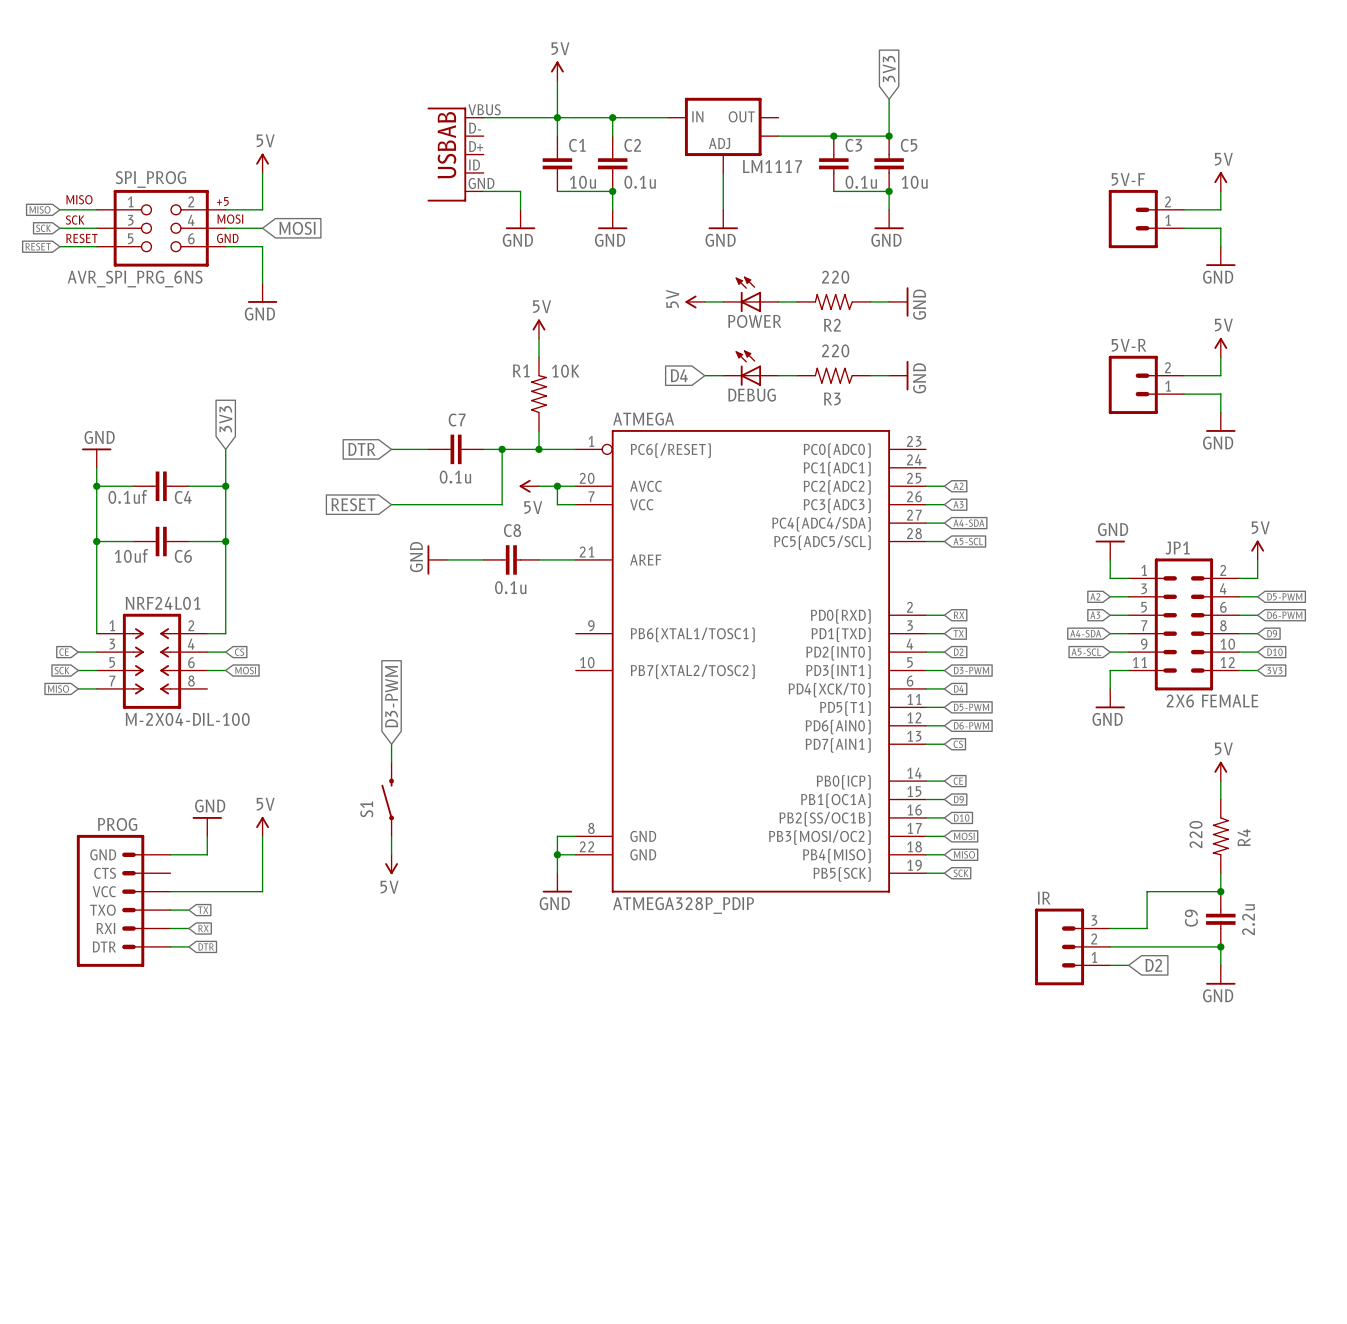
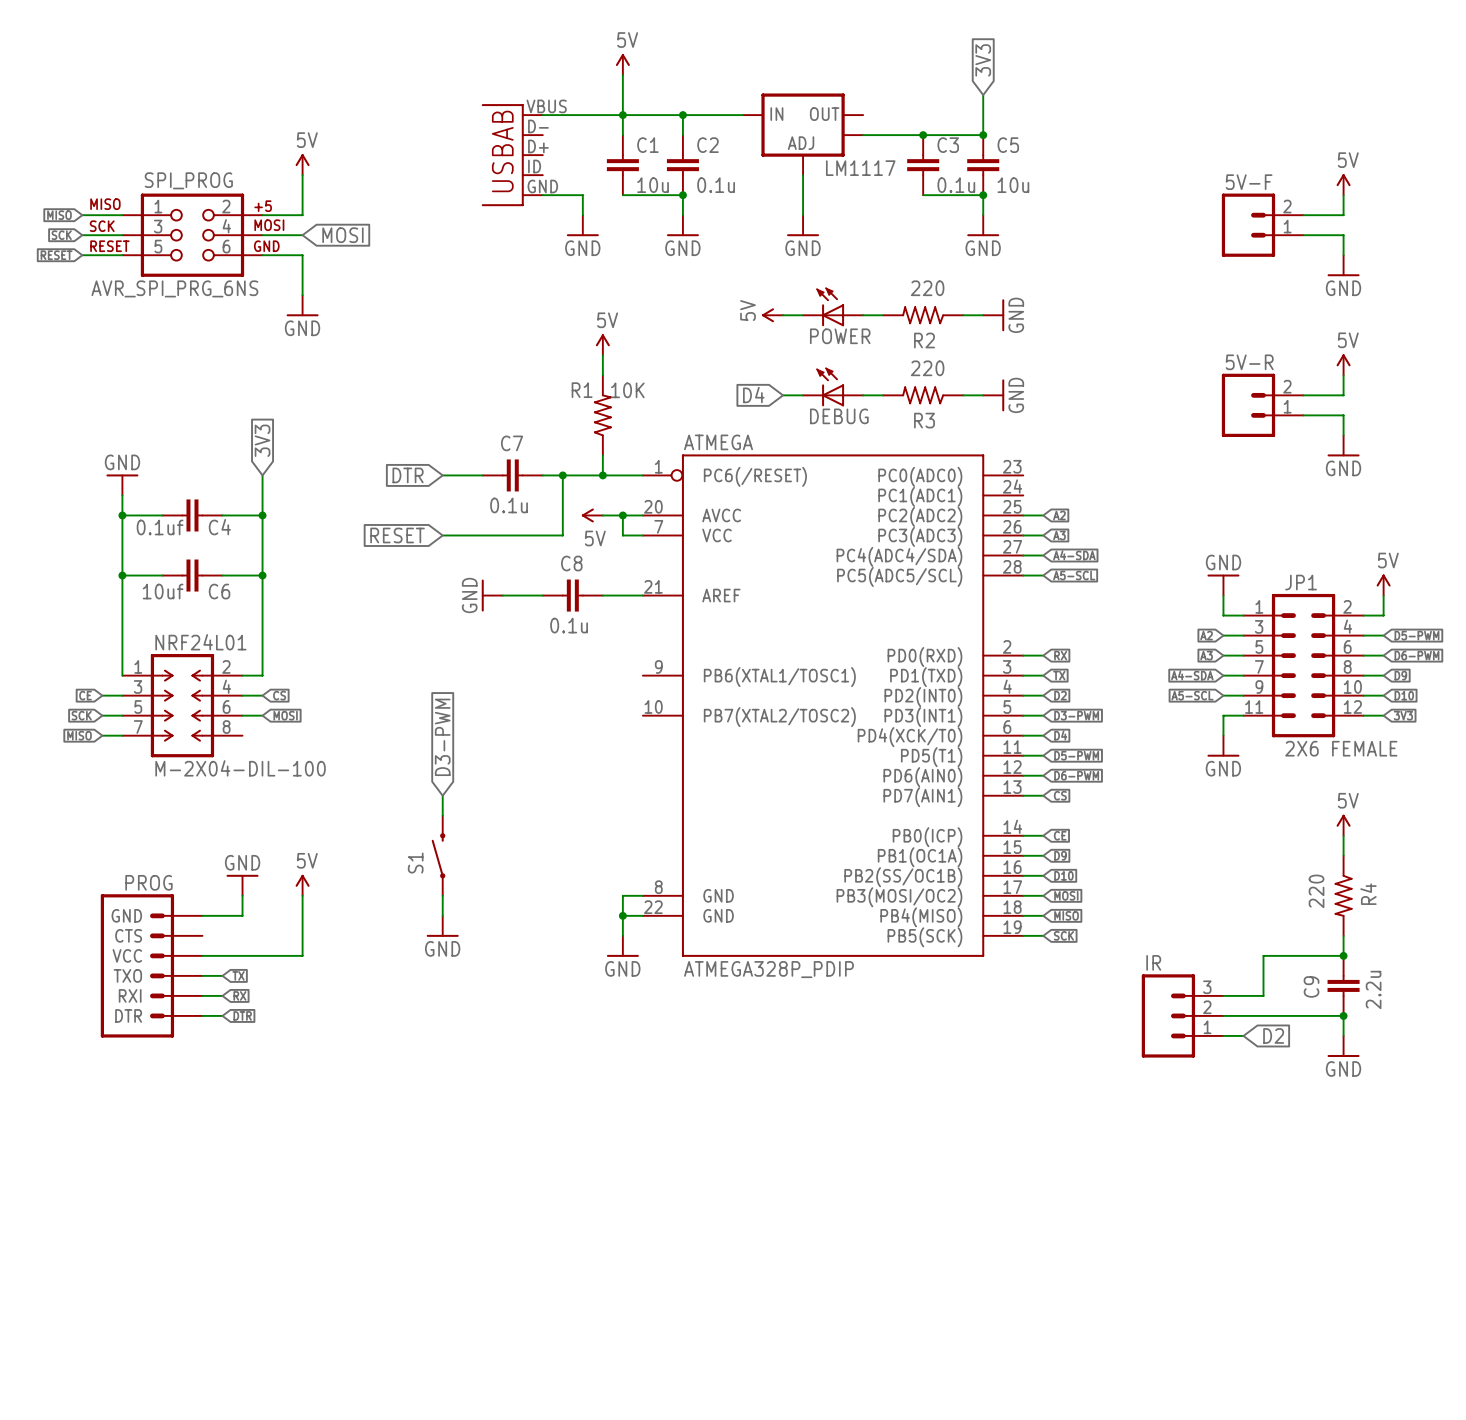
power symbol: 5V (391, 864) -> GND (442, 926)

